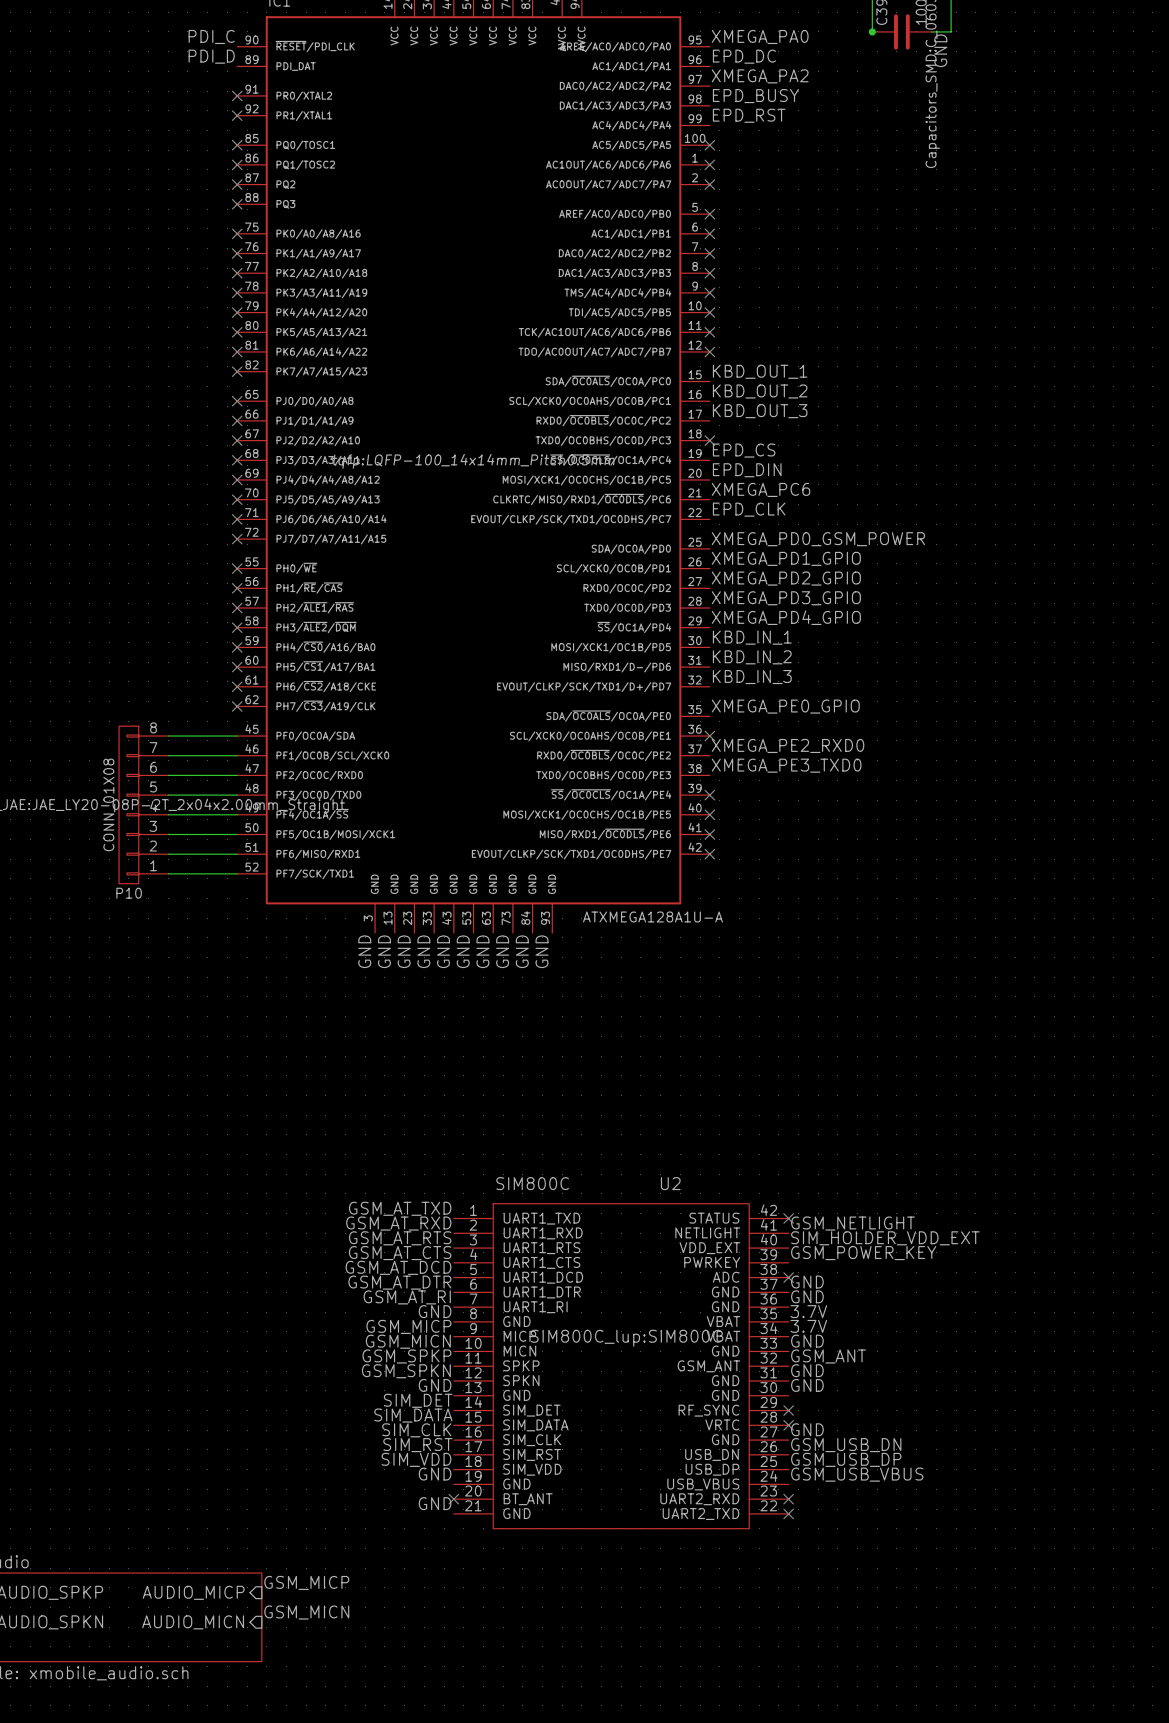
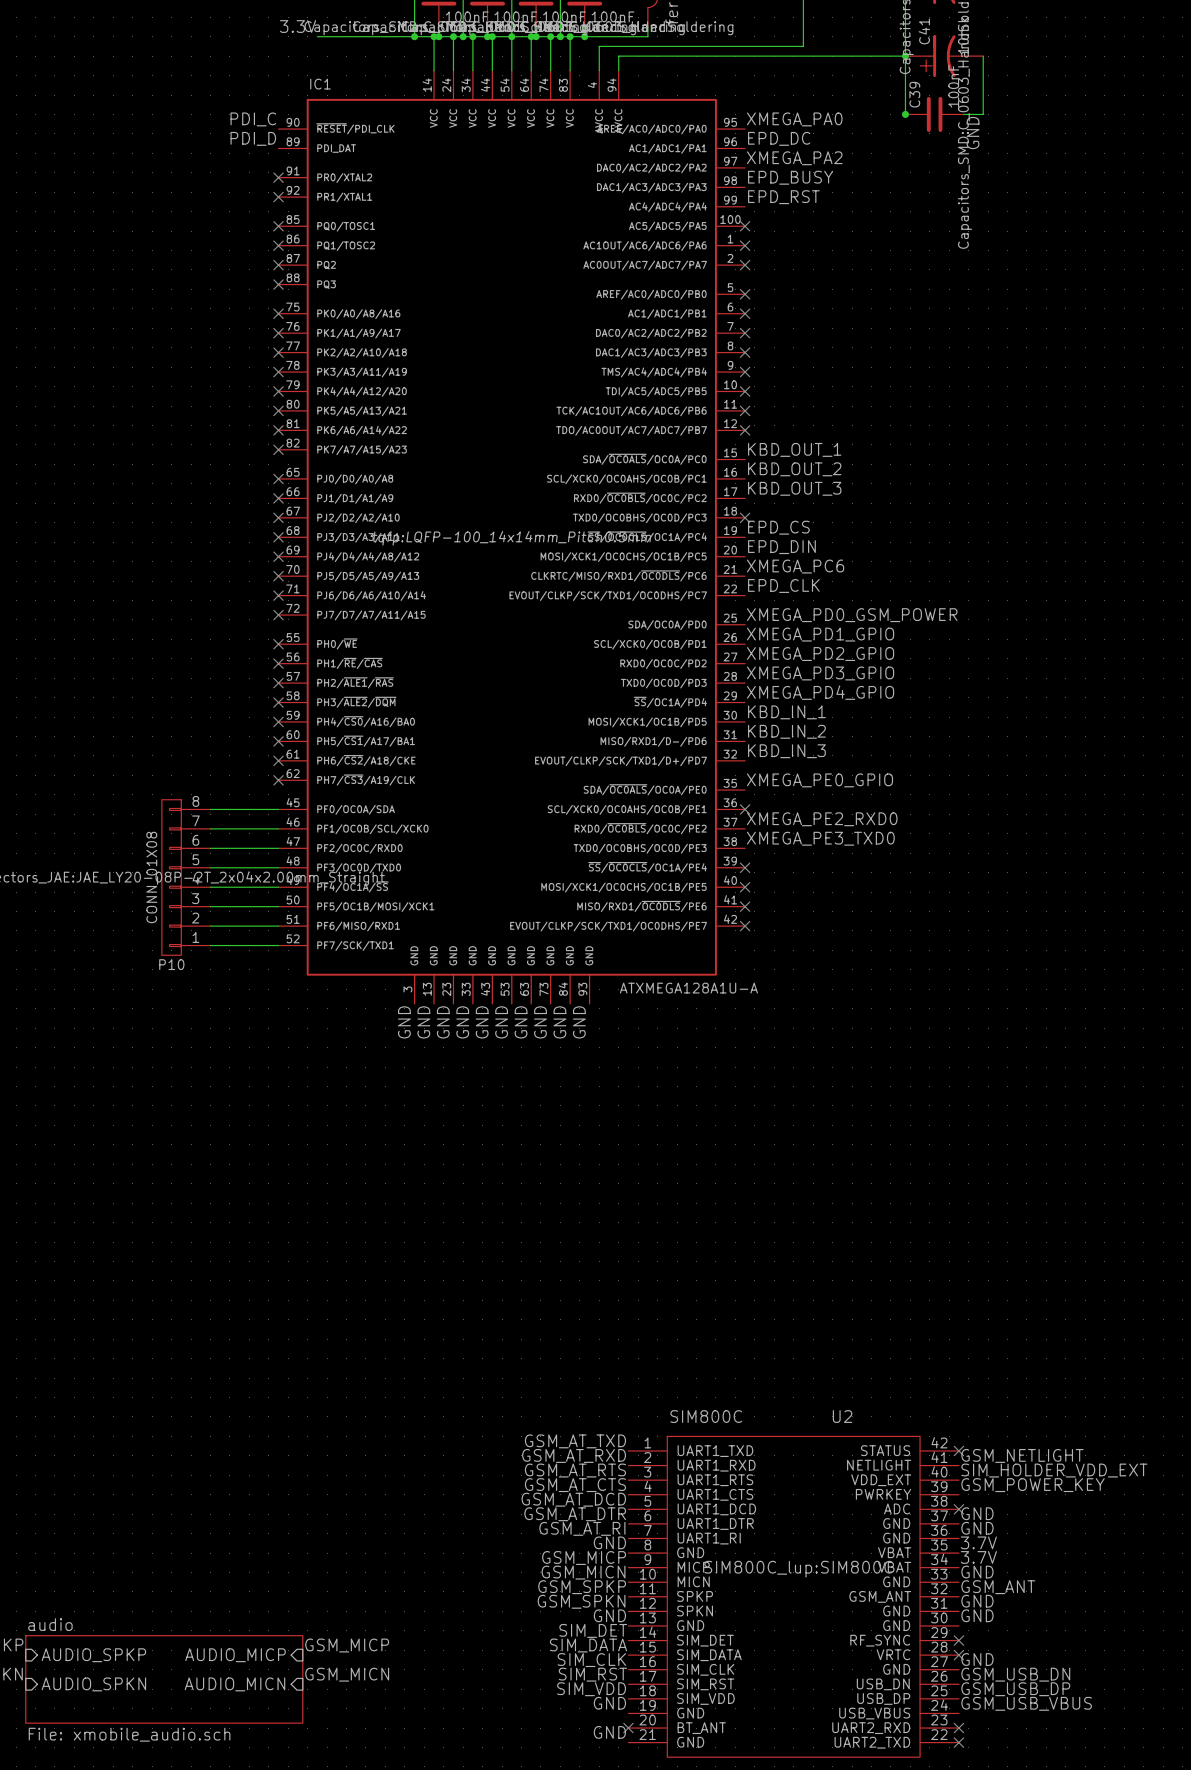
label: GSM_AT_TXD (400, 1208) -> none
no-connect mark: (788, 1218) -> none
label: GSM_AT_RXD (398, 1223) -> none
label: GSM_NETLIGHT (853, 1223) -> none
label: GSM_AT_RTS (400, 1238) -> none
label: SIM_HOLDER_VDD_EXT (885, 1238) -> none
label: GSM_AT_CTS (400, 1253) -> none
label: GSM_POWER_KEY (863, 1253) -> none
label: GSM_AT_DCD (398, 1267) -> none
no-connect mark: (788, 1277) -> none
label: GSM_AT_DTR (399, 1282) -> none
label: GND (807, 1282) -> none
label: GND (807, 1296) -> none
label: GSM_AT_RI (407, 1297) -> none
label: GND (435, 1311) -> none
label: 3.7V (808, 1311) -> none
label: GSM_MICP (408, 1326) -> none
label: 3.7V (808, 1326) -> none
label: GSM_MICN (408, 1341) -> none
label: GND (807, 1341) -> none
label: GSM_SPKP (406, 1356) -> none
label: GSM_ANT (828, 1356) -> none
U2 position: (621, 1366) -> (793, 1596)
label: GND (807, 1370) -> none
label: GSM_SPKN (406, 1371) -> none
label: none -> GSM_AT_TXD (575, 1441)
label: GND (435, 1385) -> none
label: GND (807, 1385) -> none
no-connect mark: none -> (958, 1450)
label: none -> GSM_AT_RXD (574, 1455)
label: none -> GSM_NETLIGHT (1022, 1455)
label: SIM_DET (418, 1400) -> none
label: none -> GSM_AT_RTS (575, 1470)
label: none -> SIM_HOLDER_VDD_EXT (1054, 1470)
no-connect mark: (788, 1410) -> none
label: SIM_DATA (413, 1415) -> none
label: none -> GSM_AT_CTS (575, 1485)
label: none -> GSM_POWER_KEY (1033, 1485)
no-connect mark: (788, 1425) -> none
label: GND (807, 1429) -> none
label: SIM_CLK (416, 1430) -> none
label: none -> GSM_AT_DCD (573, 1499)
label: SIM_RST (417, 1445) -> none
label: GSM_USB_DN (846, 1445) -> none
no-connect mark: none -> (958, 1509)
label: none -> GND (977, 1513)
label: none -> GSM_AT_DTR (575, 1514)
label: SIM_VDD (416, 1459) -> none
label: GSM_USB_DP (846, 1459) -> none
label: none -> GSM_AT_RI (582, 1528)
label: none -> GND (977, 1528)
label: GND (435, 1474) -> none
label: GSM_USB_VBUS (857, 1474) -> none
label: none -> GND (609, 1542)
label: none -> 3.7V (978, 1542)
label: none -> 3.7V (978, 1557)
label: none -> GSM_MICP (584, 1558)
no-connect mark: (453, 1499) -> none
no-connect mark: (788, 1499) -> none
label: GND (435, 1503) -> none
label: none -> GND (977, 1572)
label: none -> GSM_MICN (583, 1572)
no-connect mark: (788, 1513) -> none
label: none -> GSM_SPKP (582, 1587)
label: none -> GSM_ANT (998, 1587)
label: none -> GSM_SPKN (581, 1601)
label: none -> GND (977, 1601)
label: none -> GND (609, 1615)
label: none -> GND (977, 1615)
label: none -> SIM_DET (593, 1630)
no-connect mark: none -> (958, 1640)
label: none -> SIM_DATA (588, 1645)
no-connect mark: none -> (958, 1655)
label: none -> SIM_CLK (591, 1660)
label: none -> GND (977, 1659)
label: none -> SIM_RST (592, 1674)
label: none -> GSM_USB_DN (1015, 1674)
label: none -> SIM_VDD (591, 1689)
label: none -> GSM_USB_DP (1015, 1689)
label: none -> GND (609, 1703)
label: none -> GSM_USB_VBUS (1026, 1703)
no-connect mark: none -> (628, 1728)
no-connect mark: none -> (958, 1728)
label: none -> GND (609, 1732)
no-connect mark: none -> (958, 1742)

